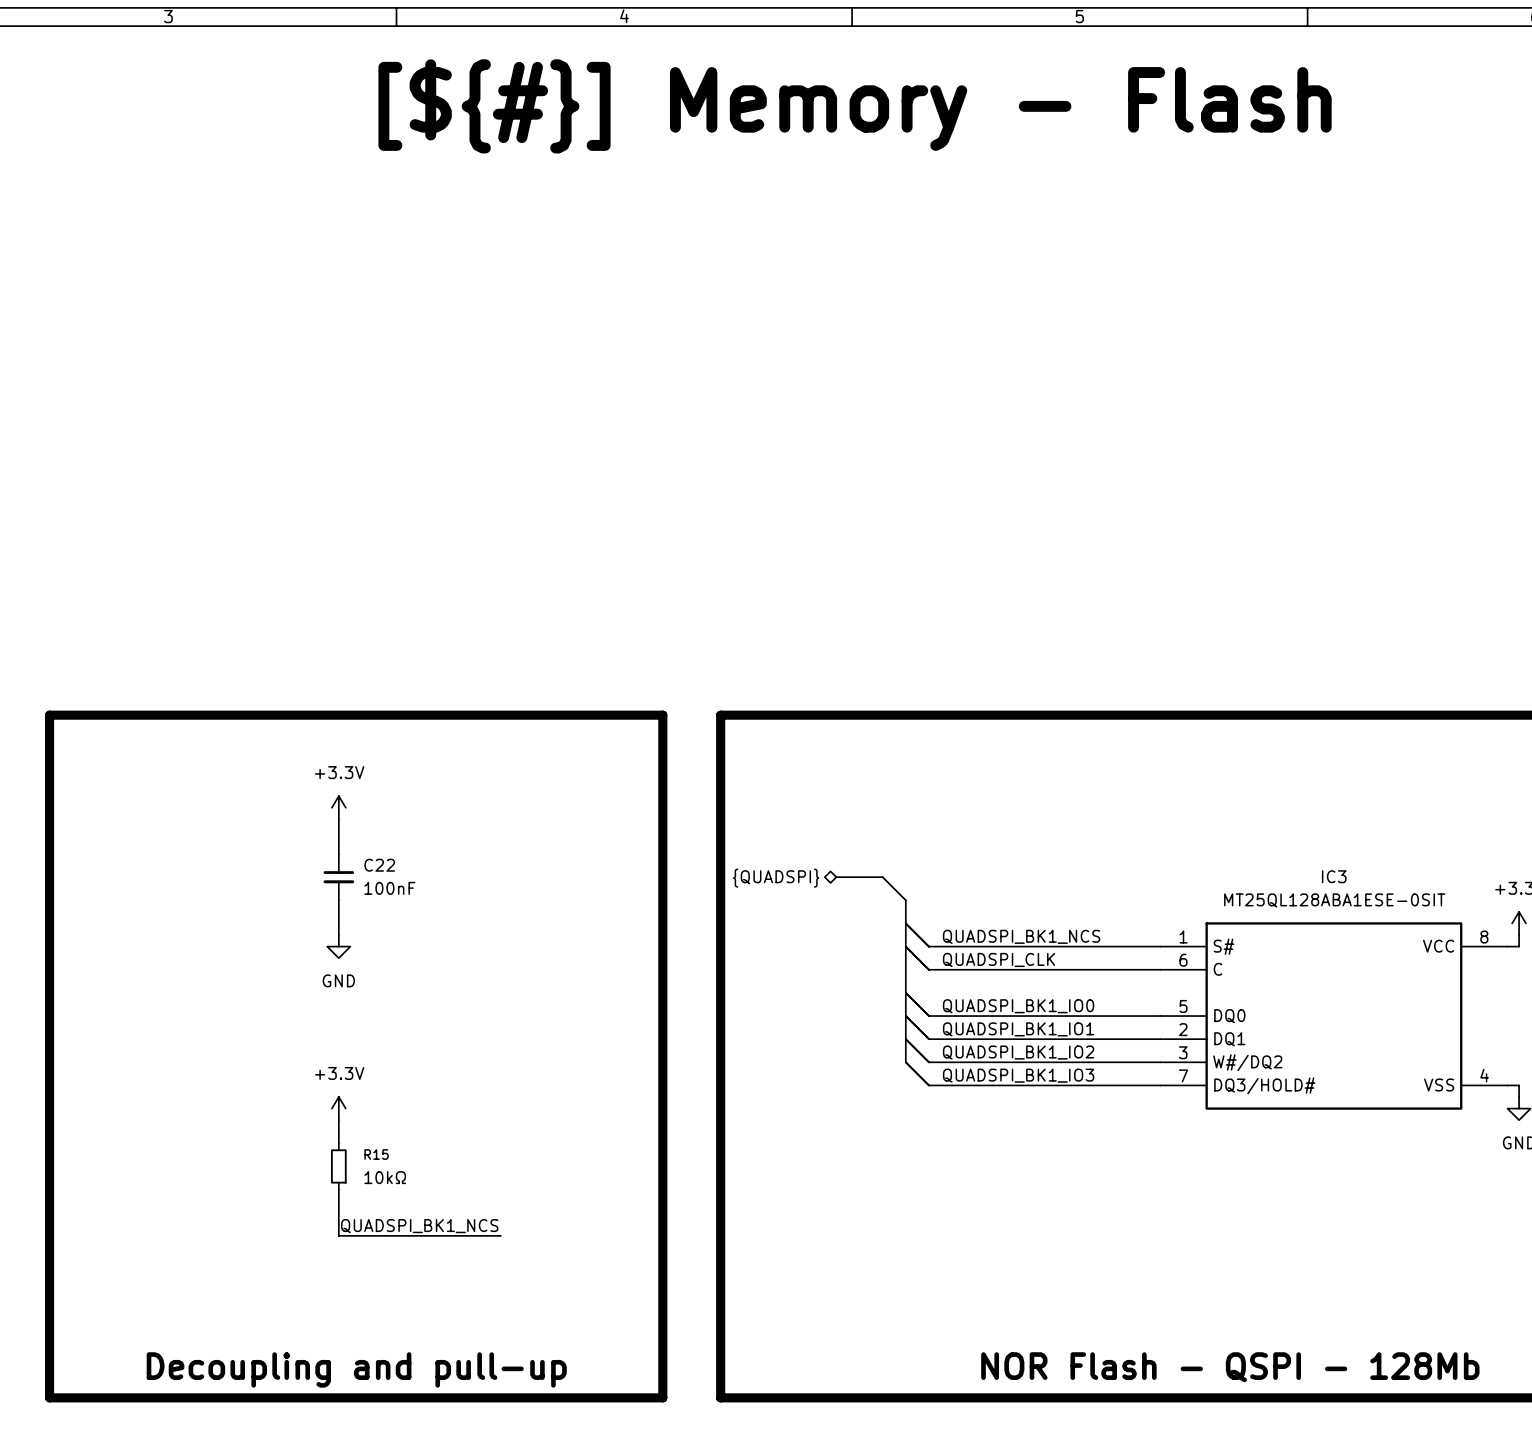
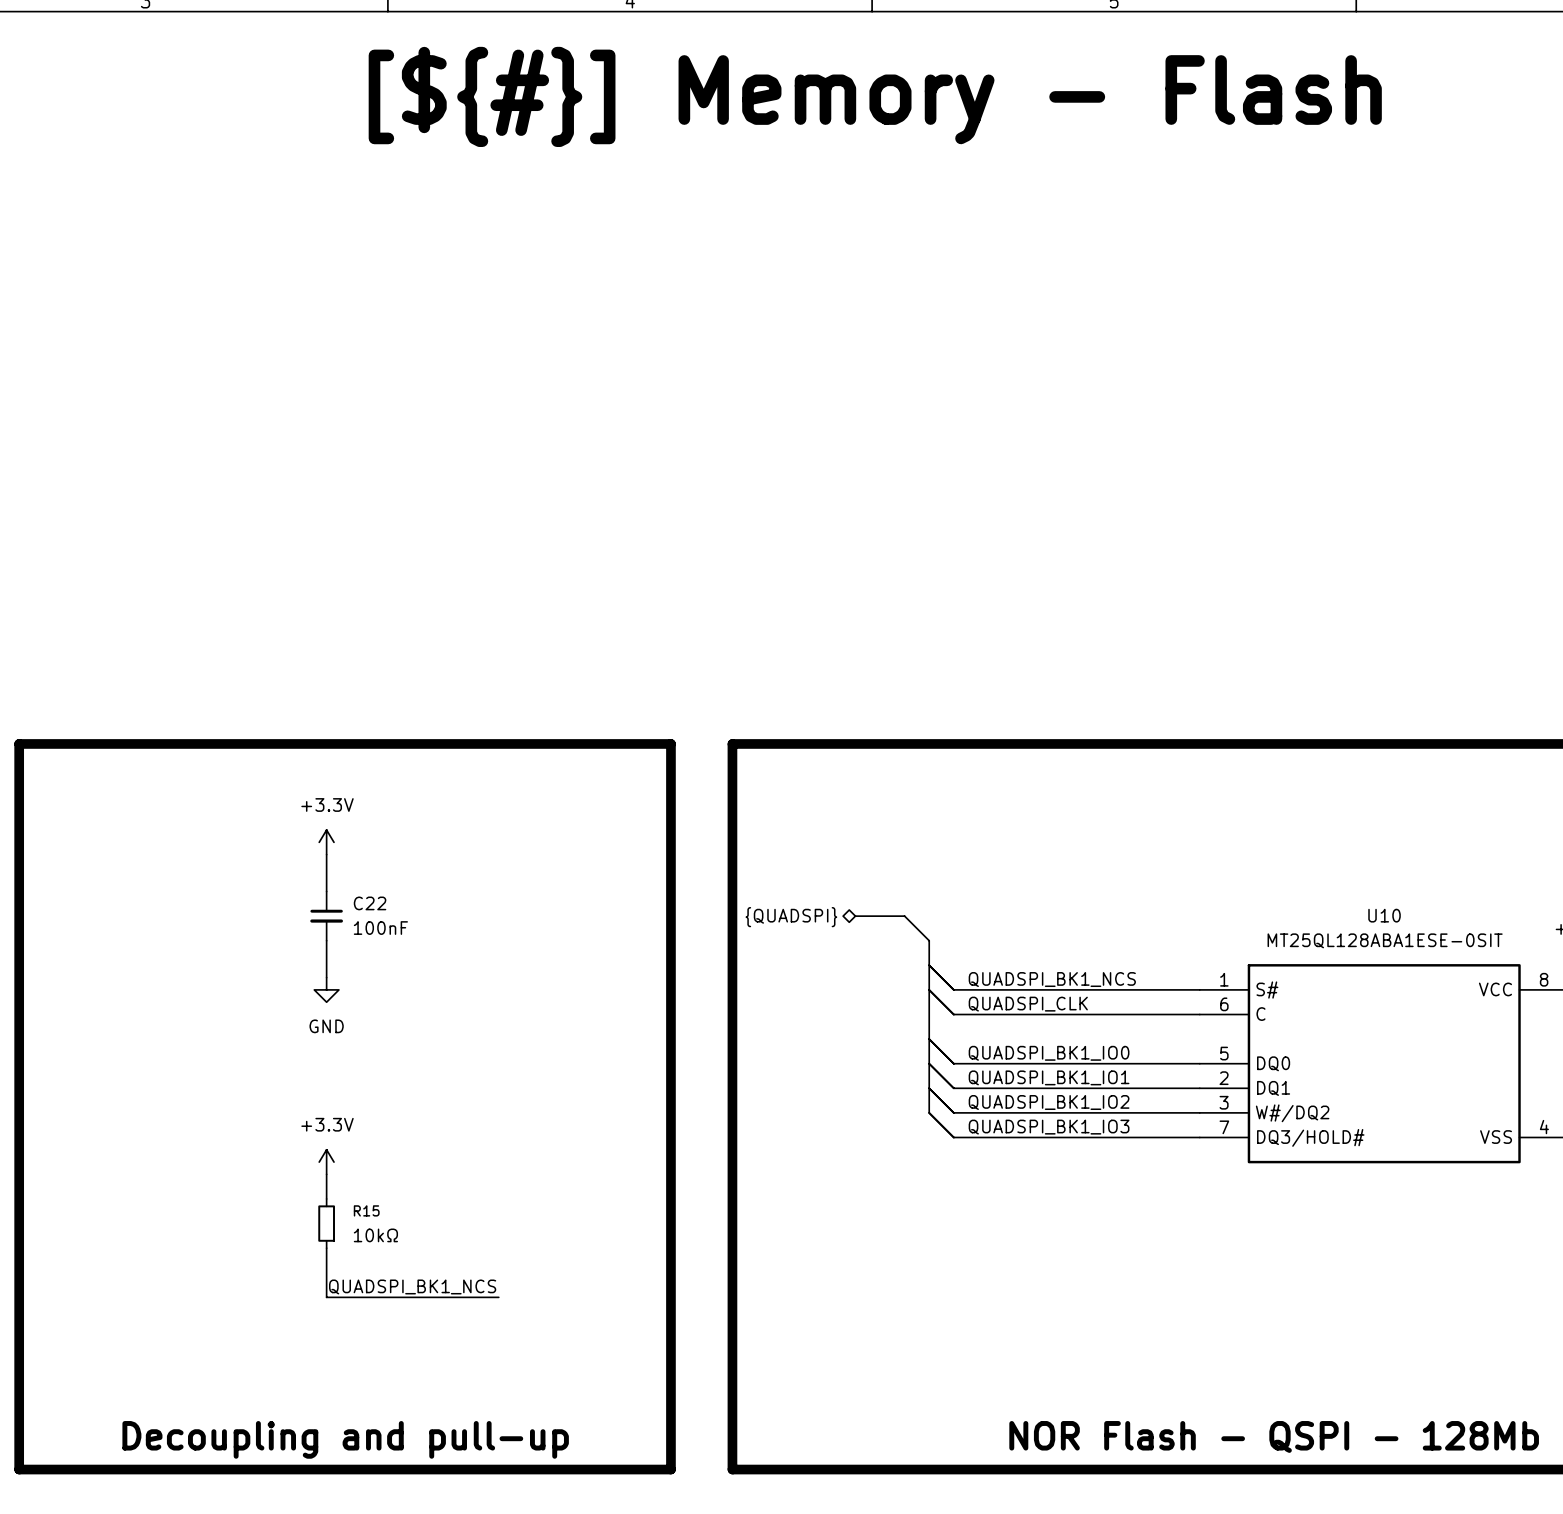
IC3 name: IC3 (1334, 876) -> U10 (1384, 915)

